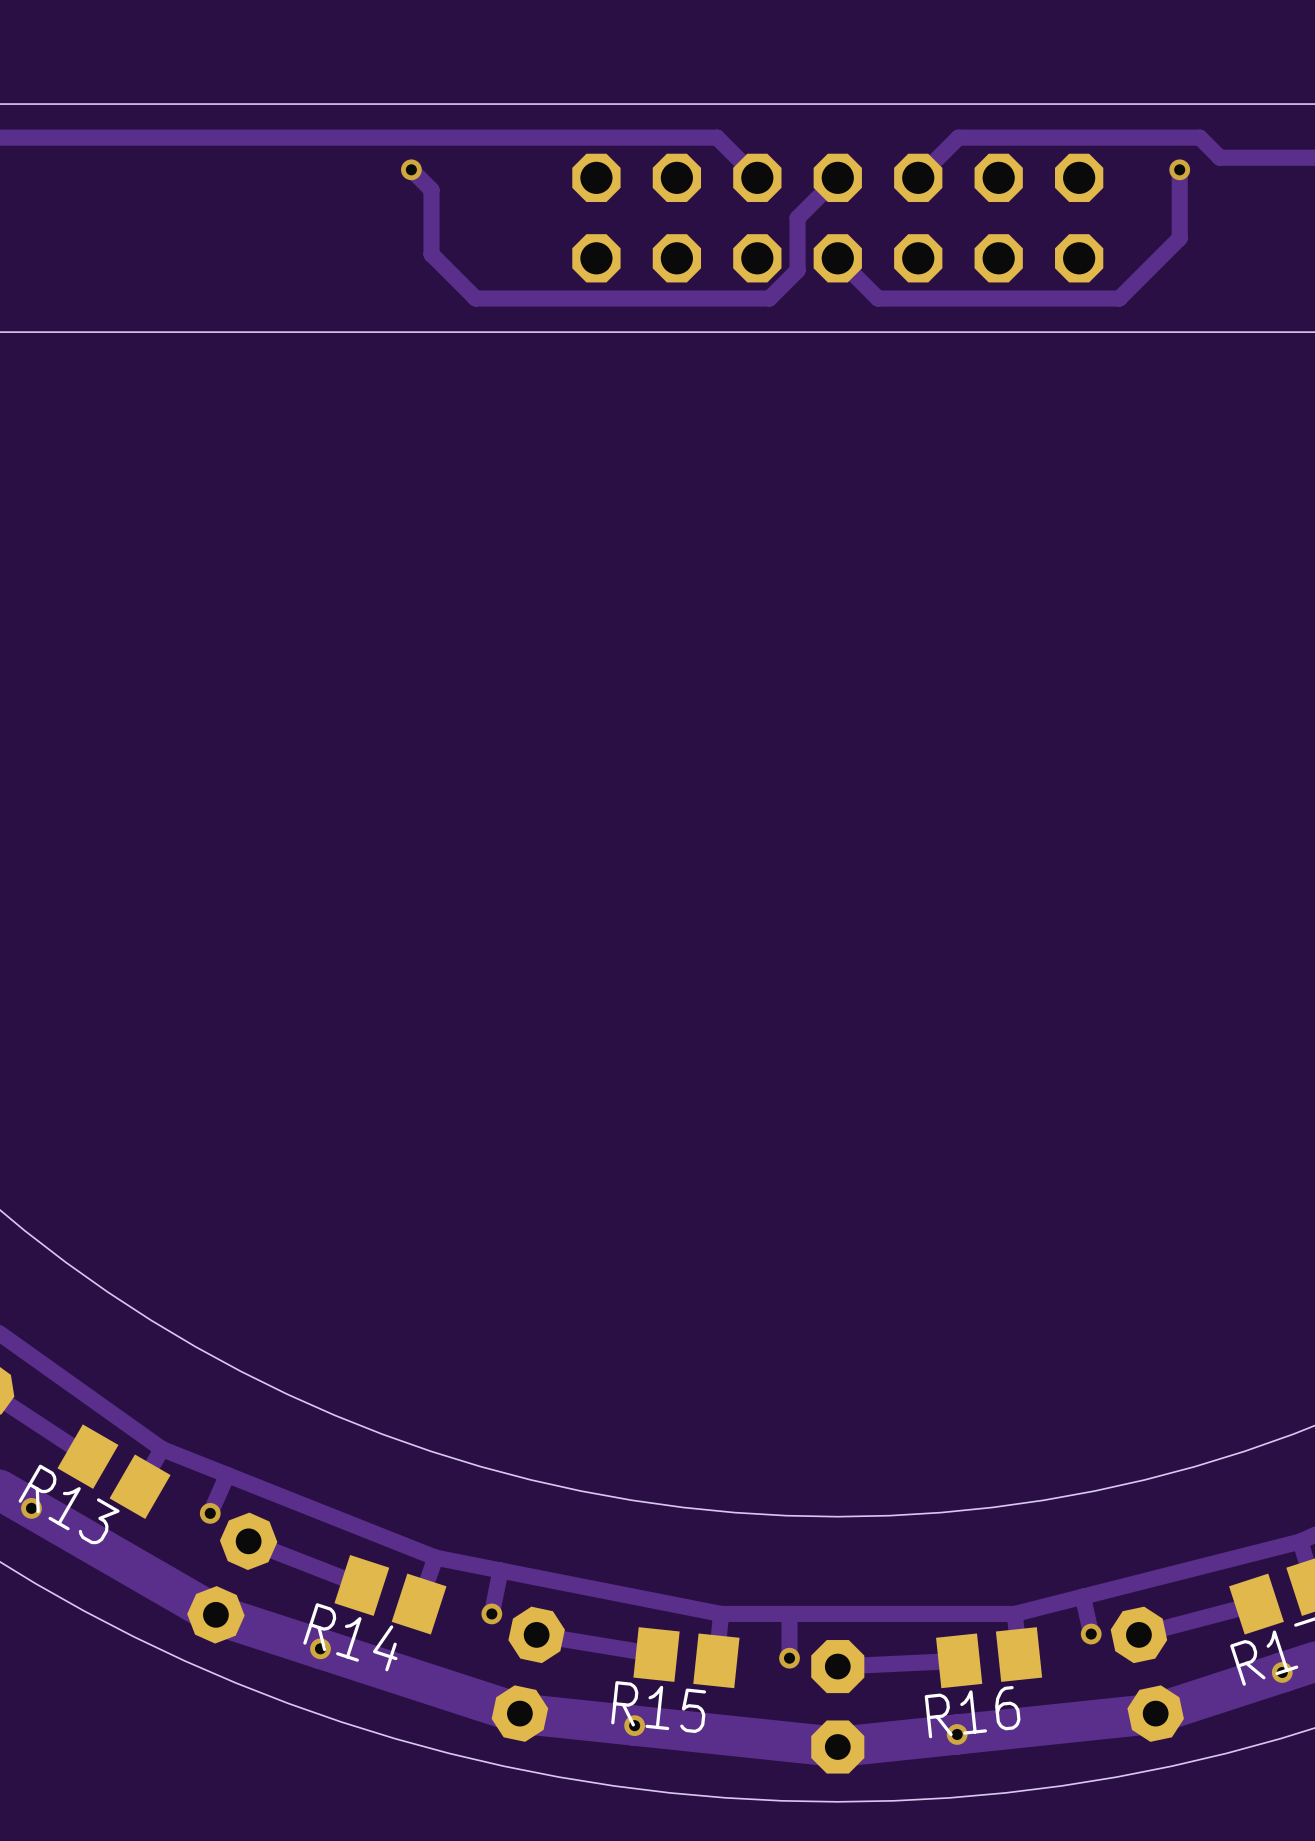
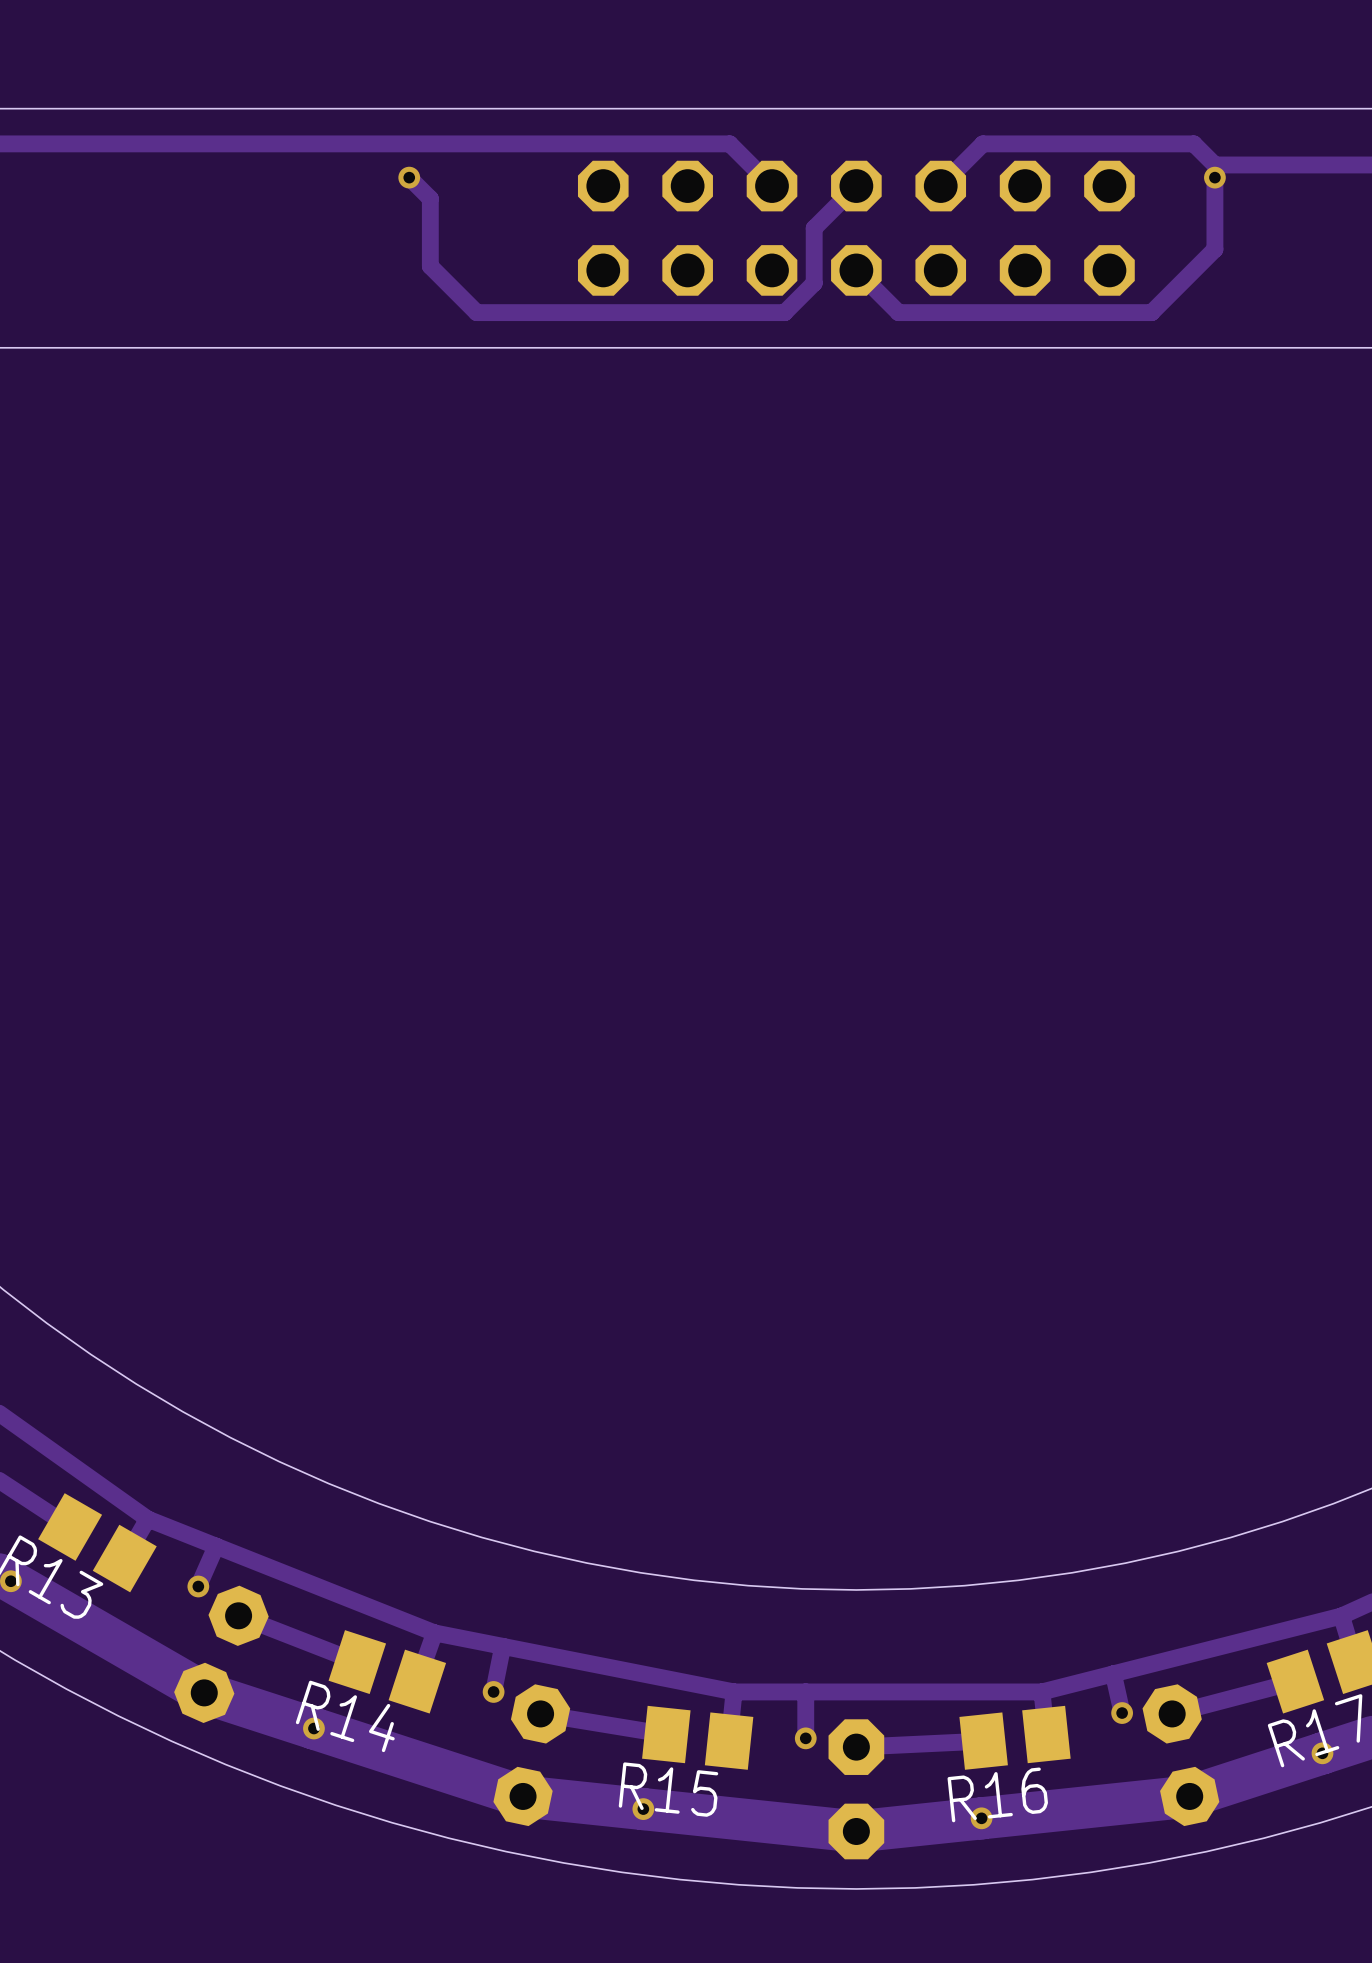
track: (1159, 137) (1199, 137) (1219, 157) -> (1193, 143) (1214, 164) (1257, 164)

